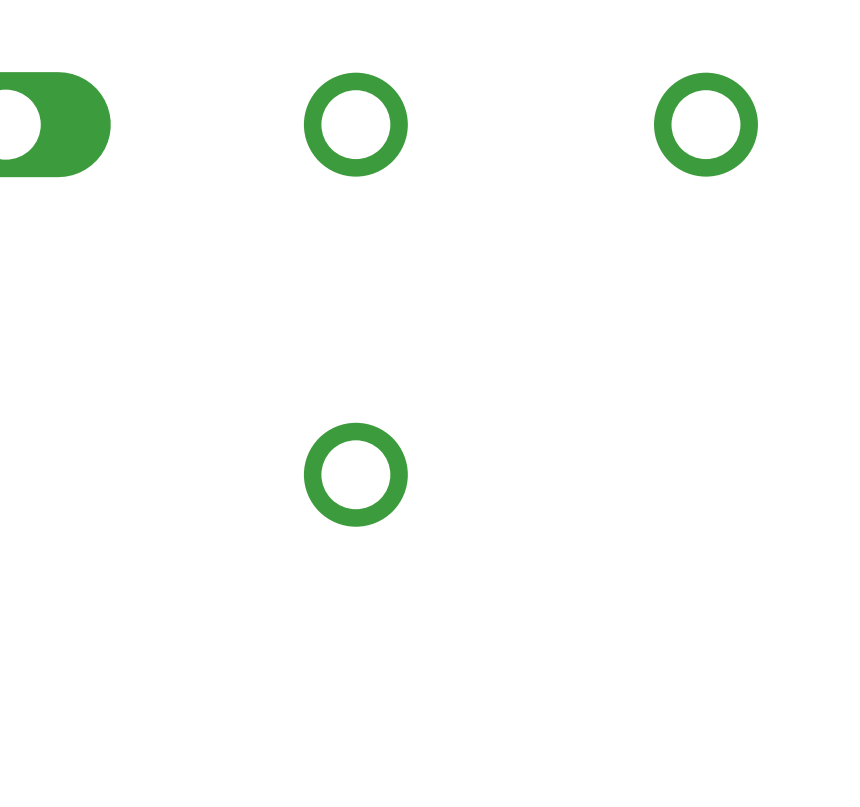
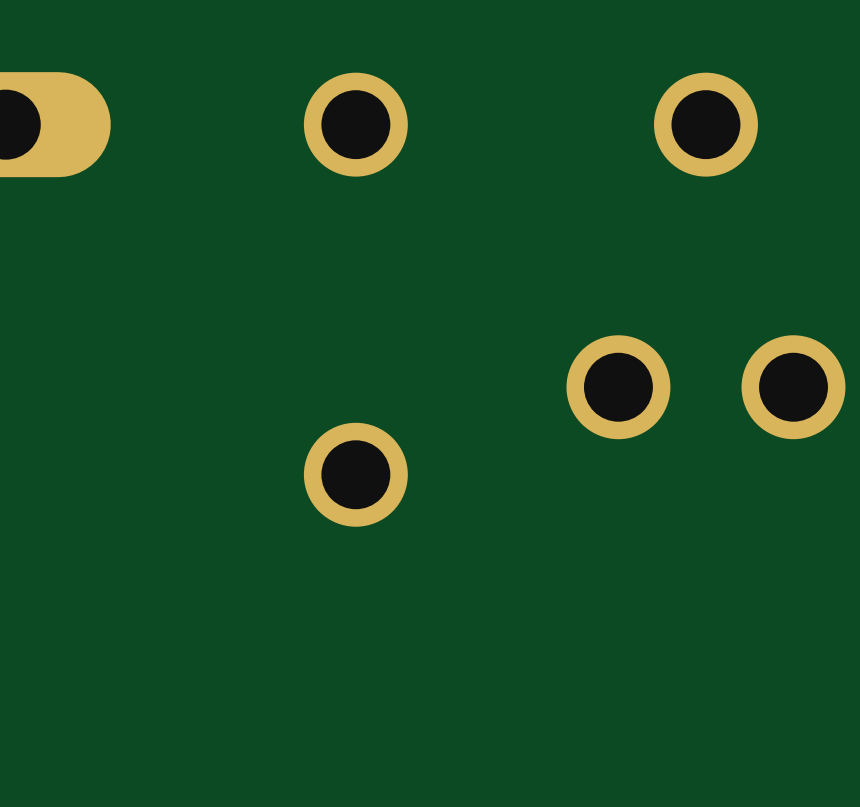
part: none -> (705, 387)

